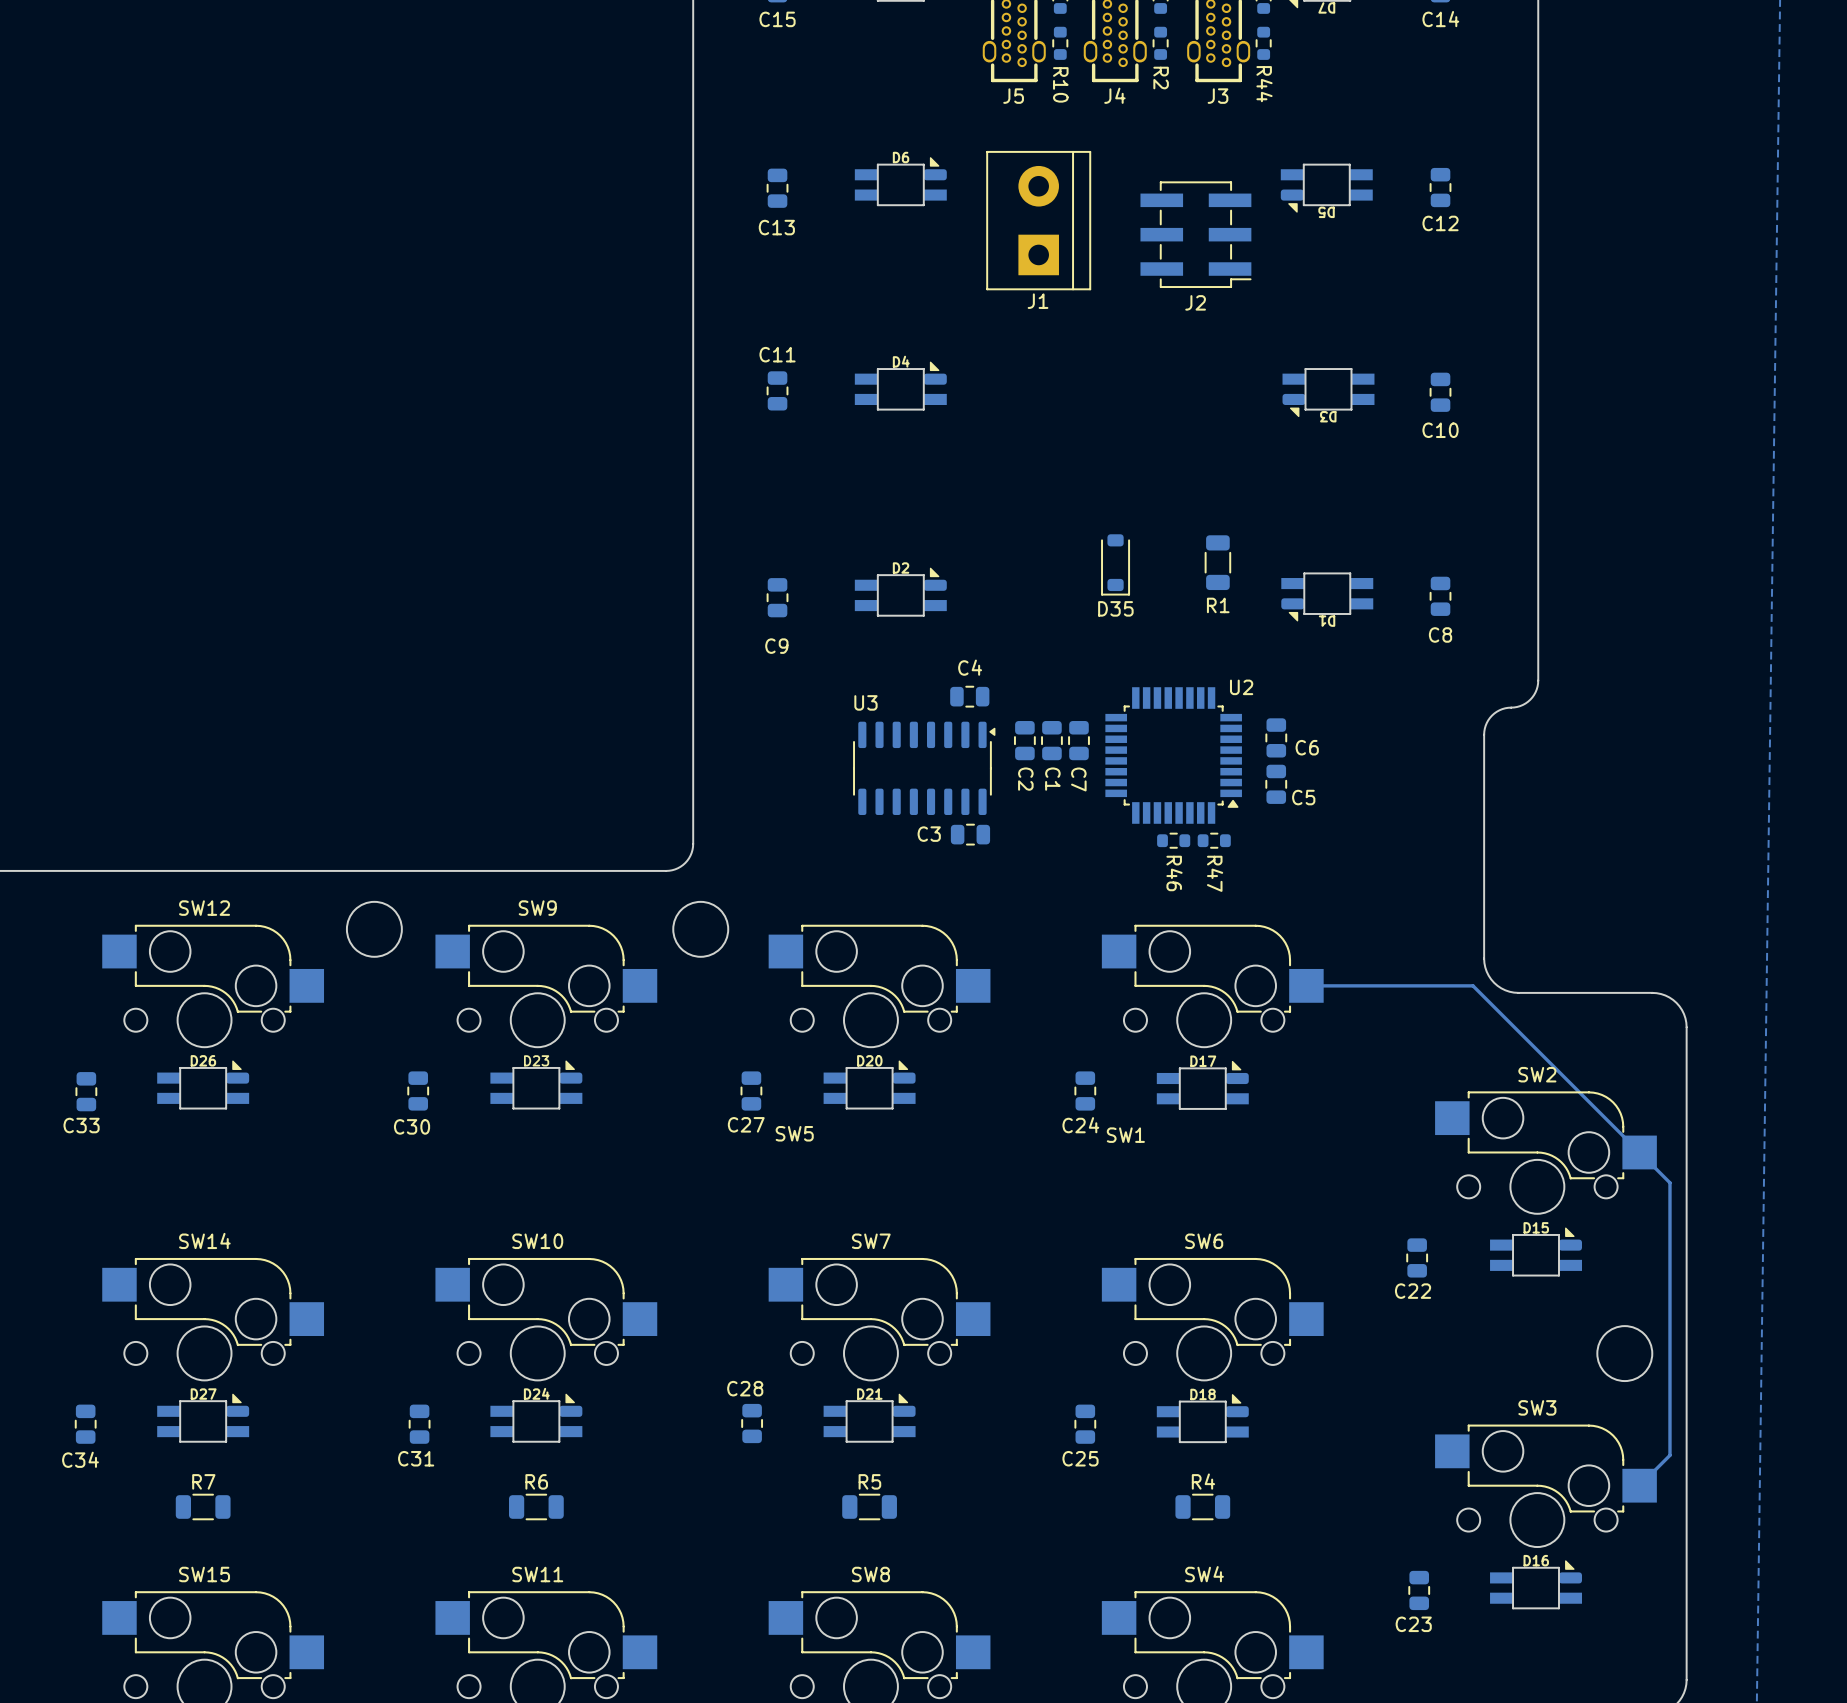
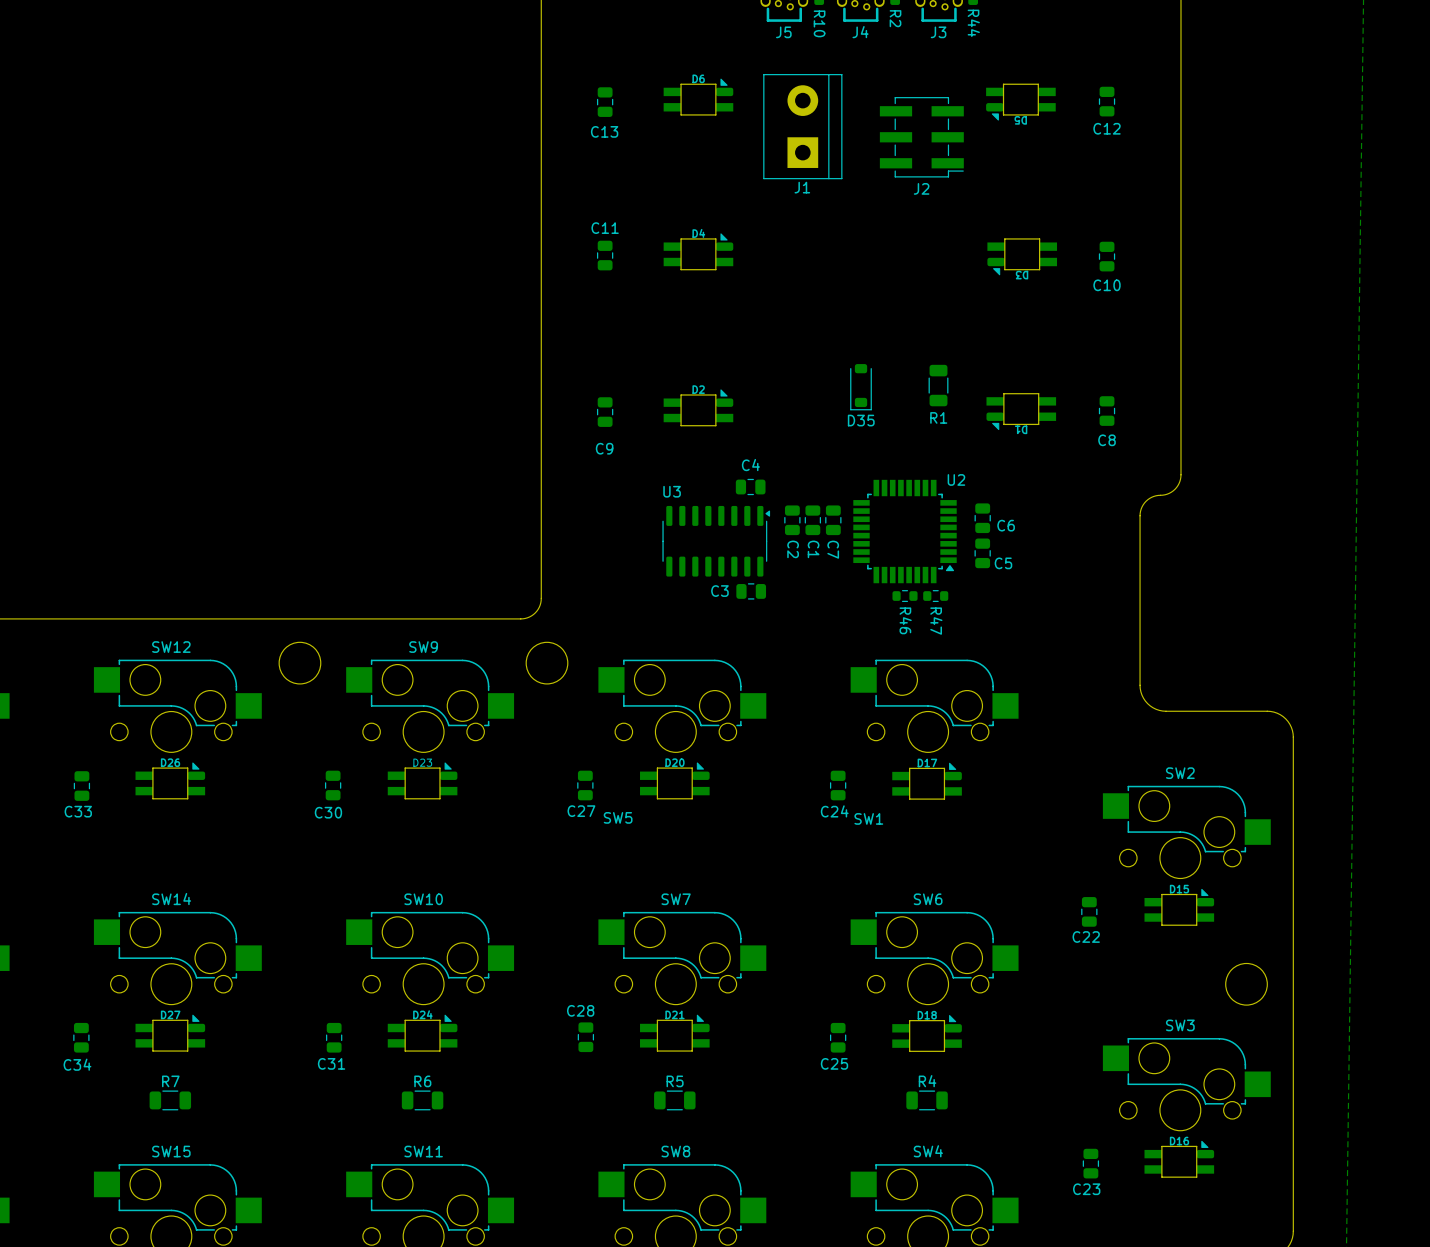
track: (1306, 985) (1473, 985) (1669, 1182) (1669, 1455) (1639, 1485) -> none

